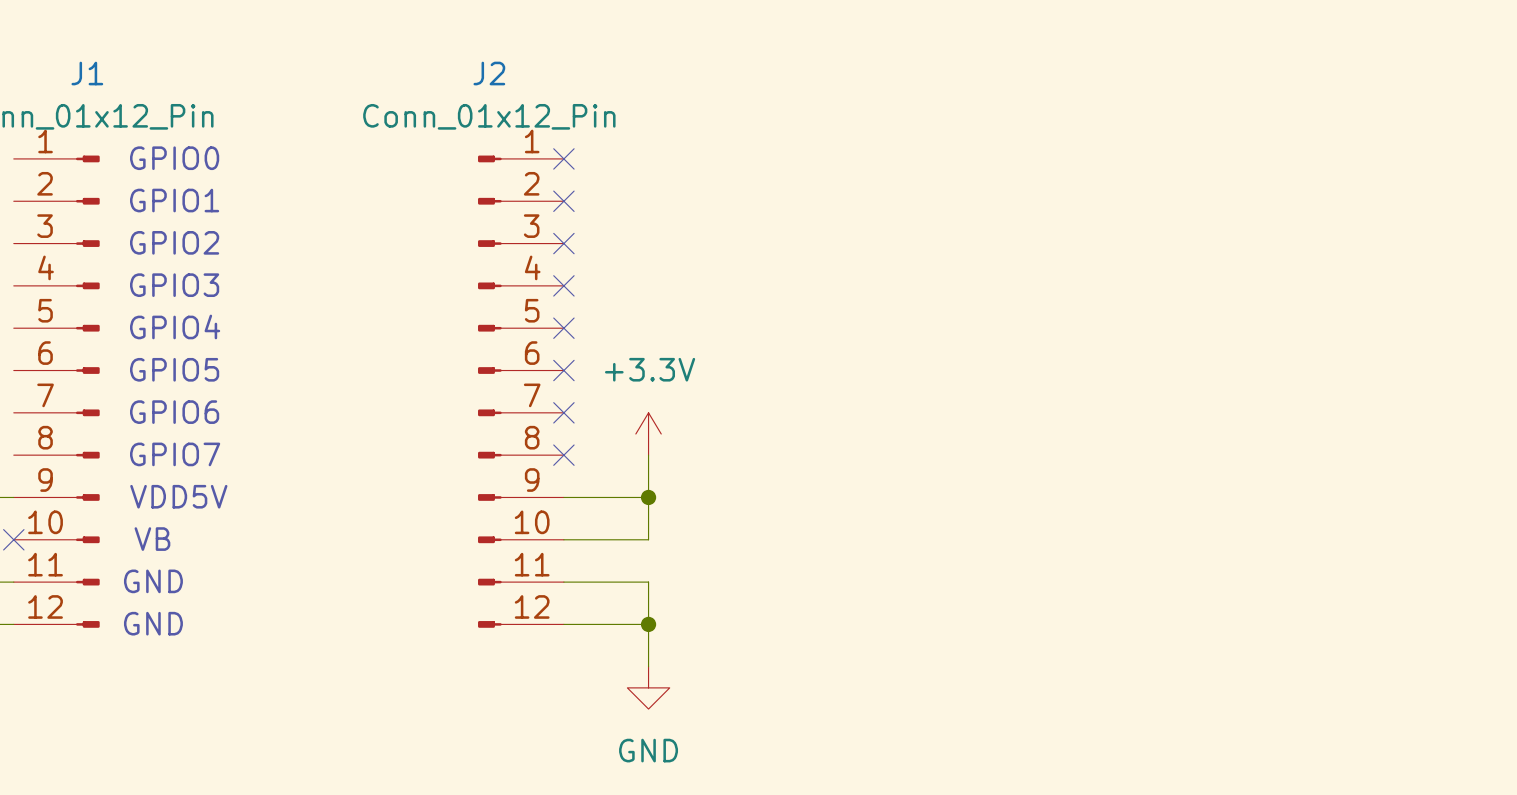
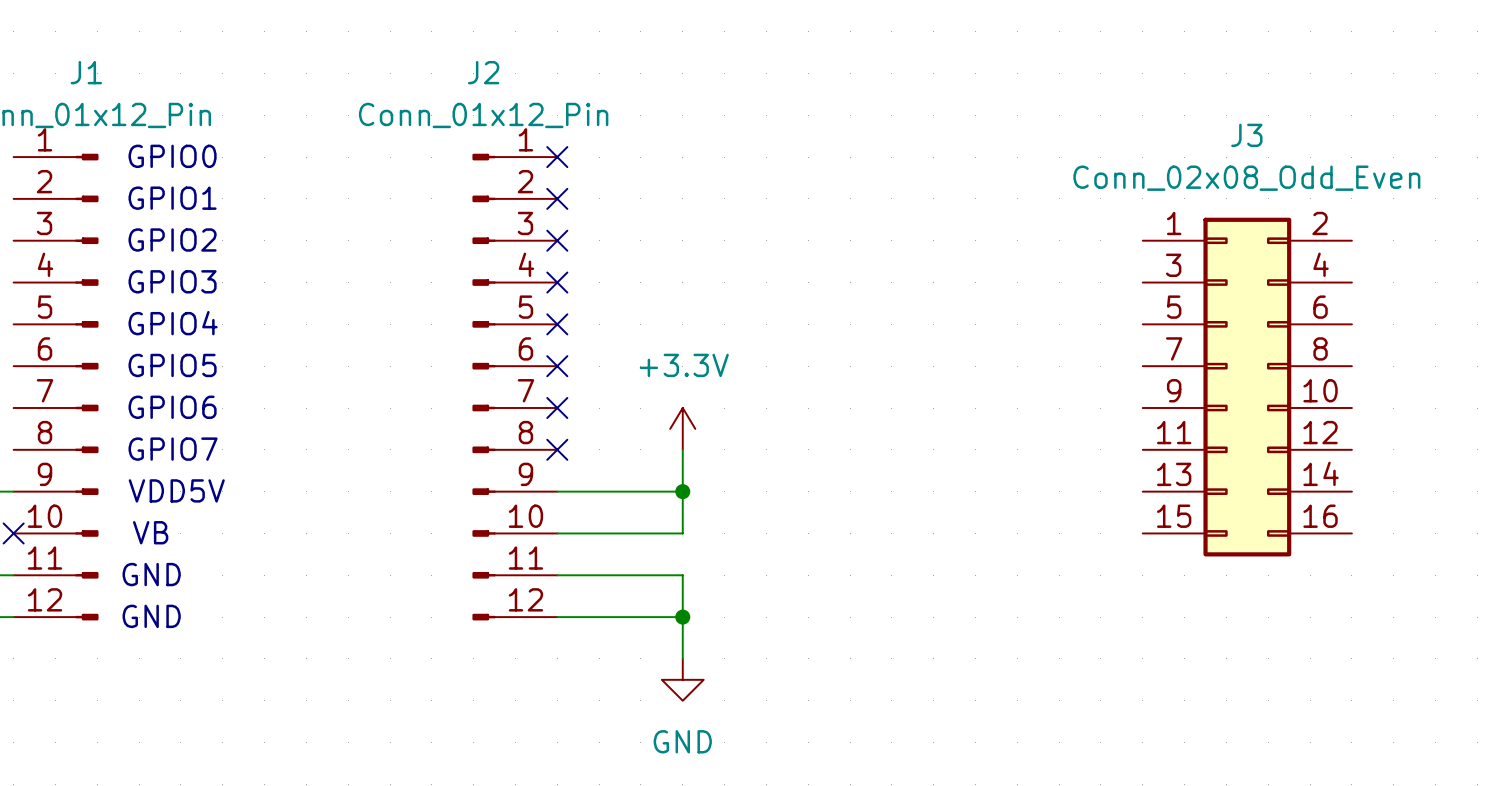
J3: none -> Conn_02x08_Odd_Even (1247, 387)
power symbol position: +3.3V (648, 433) -> +3.3V (682, 428)
wire: (648, 455) (648, 539) -> (682, 449) (682, 533) (640, 533)
wire: none -> (640, 491) (682, 491)
junction position: (648, 497) -> (682, 491)
wire: (648, 582) (648, 666) -> (640, 575) (682, 575) (682, 658)
wire: none -> (640, 617) (682, 617)
junction position: (648, 624) -> (682, 617)
power symbol position: GND (648, 687) -> GND (682, 679)

